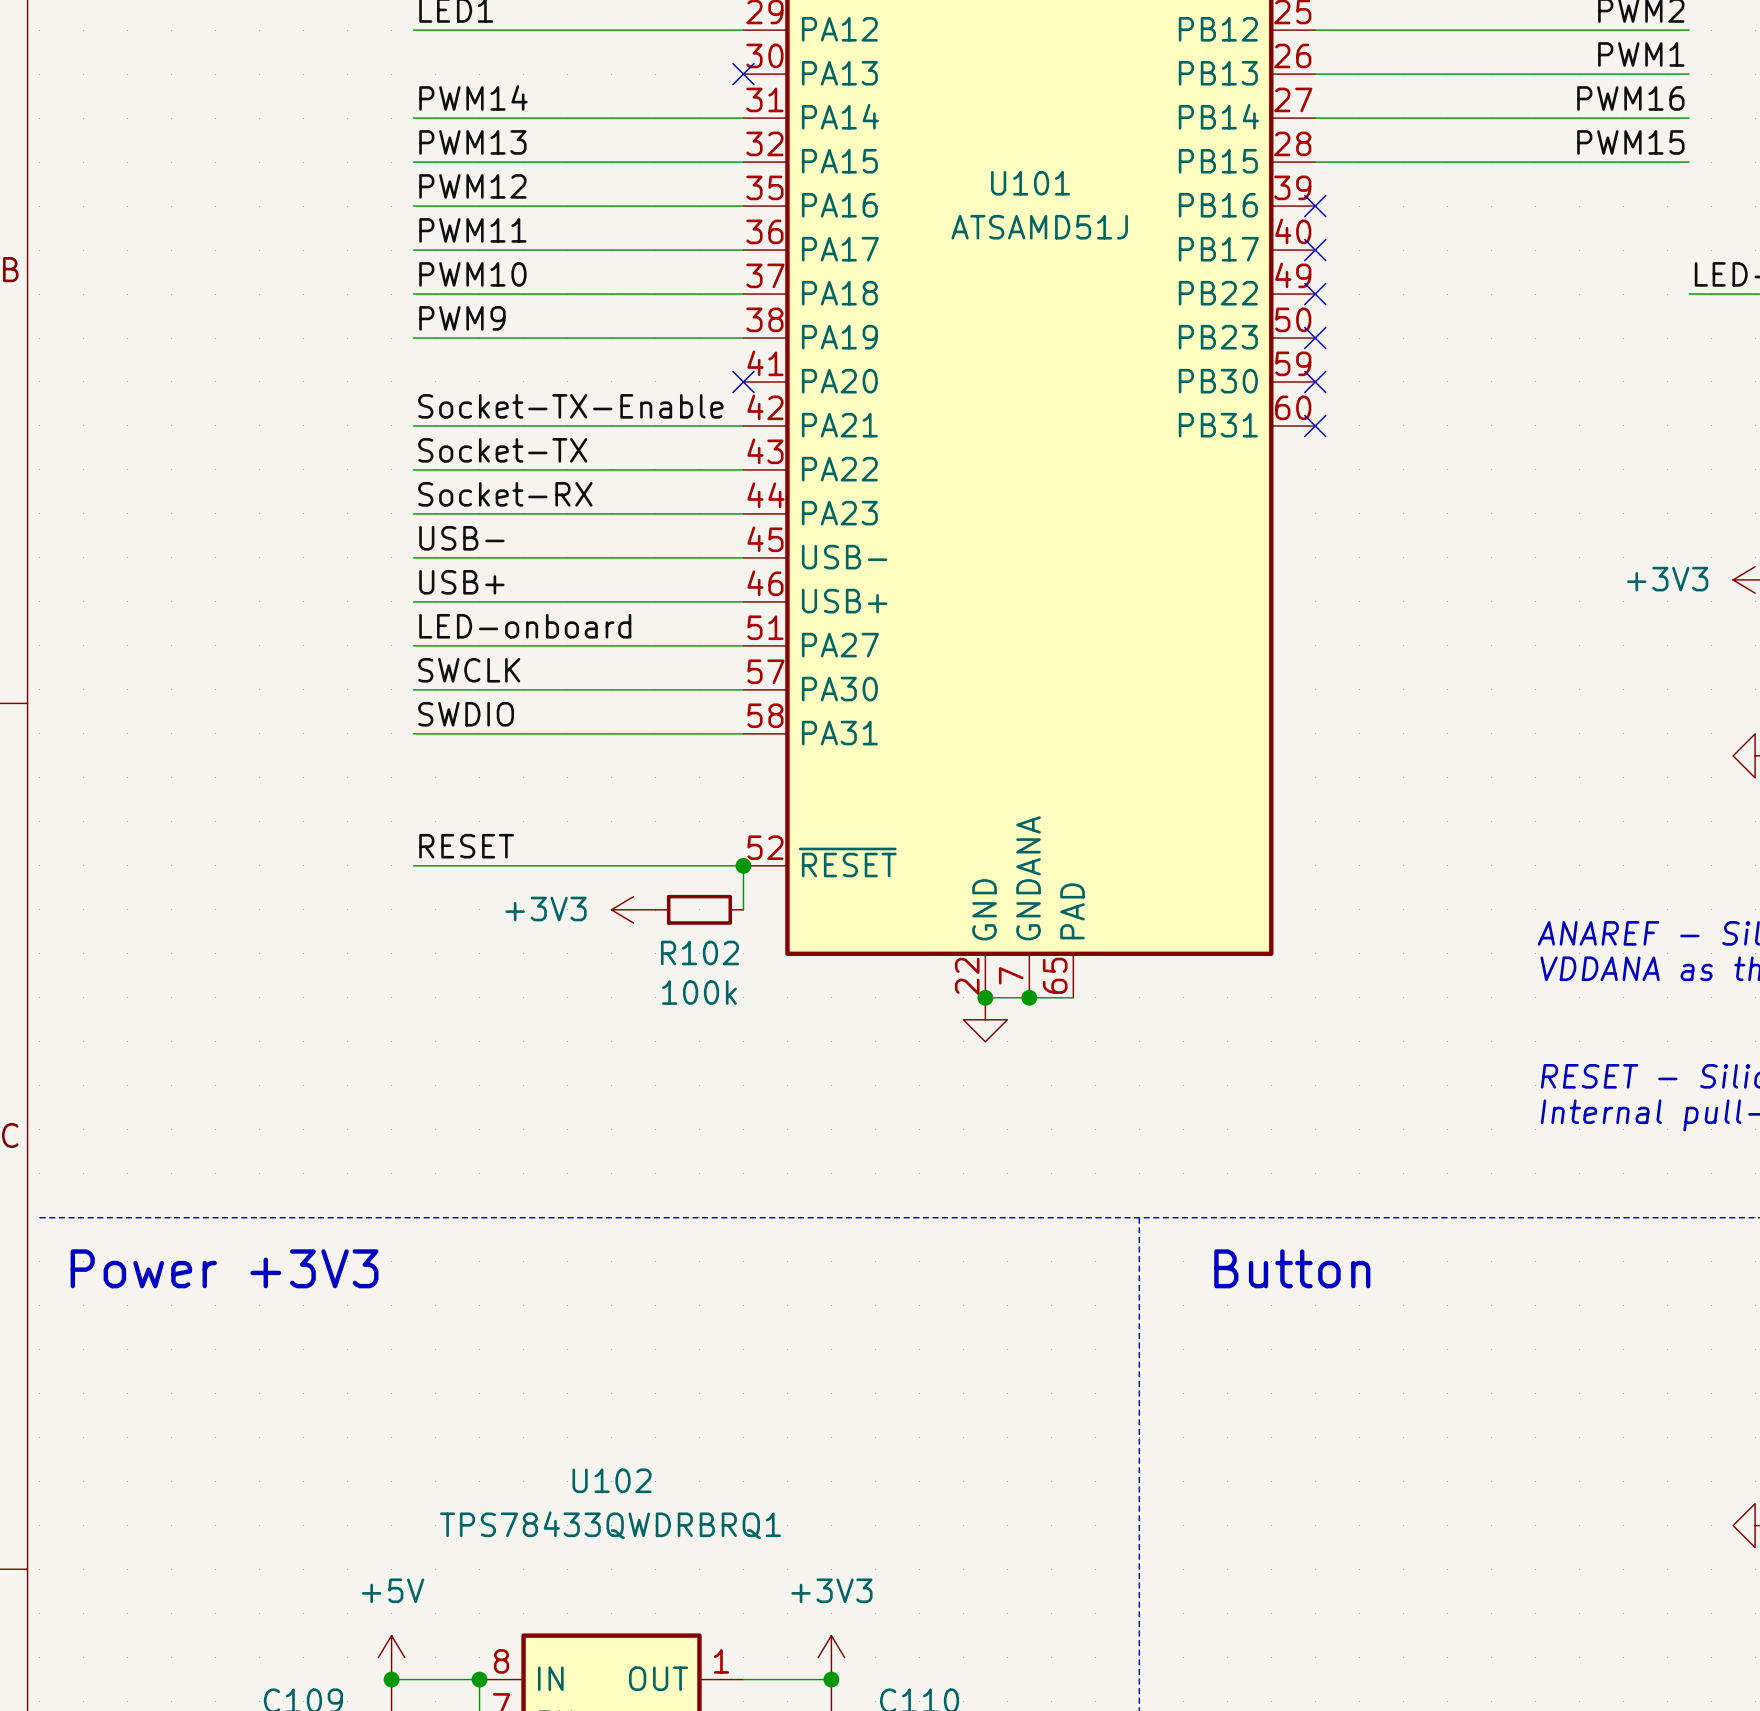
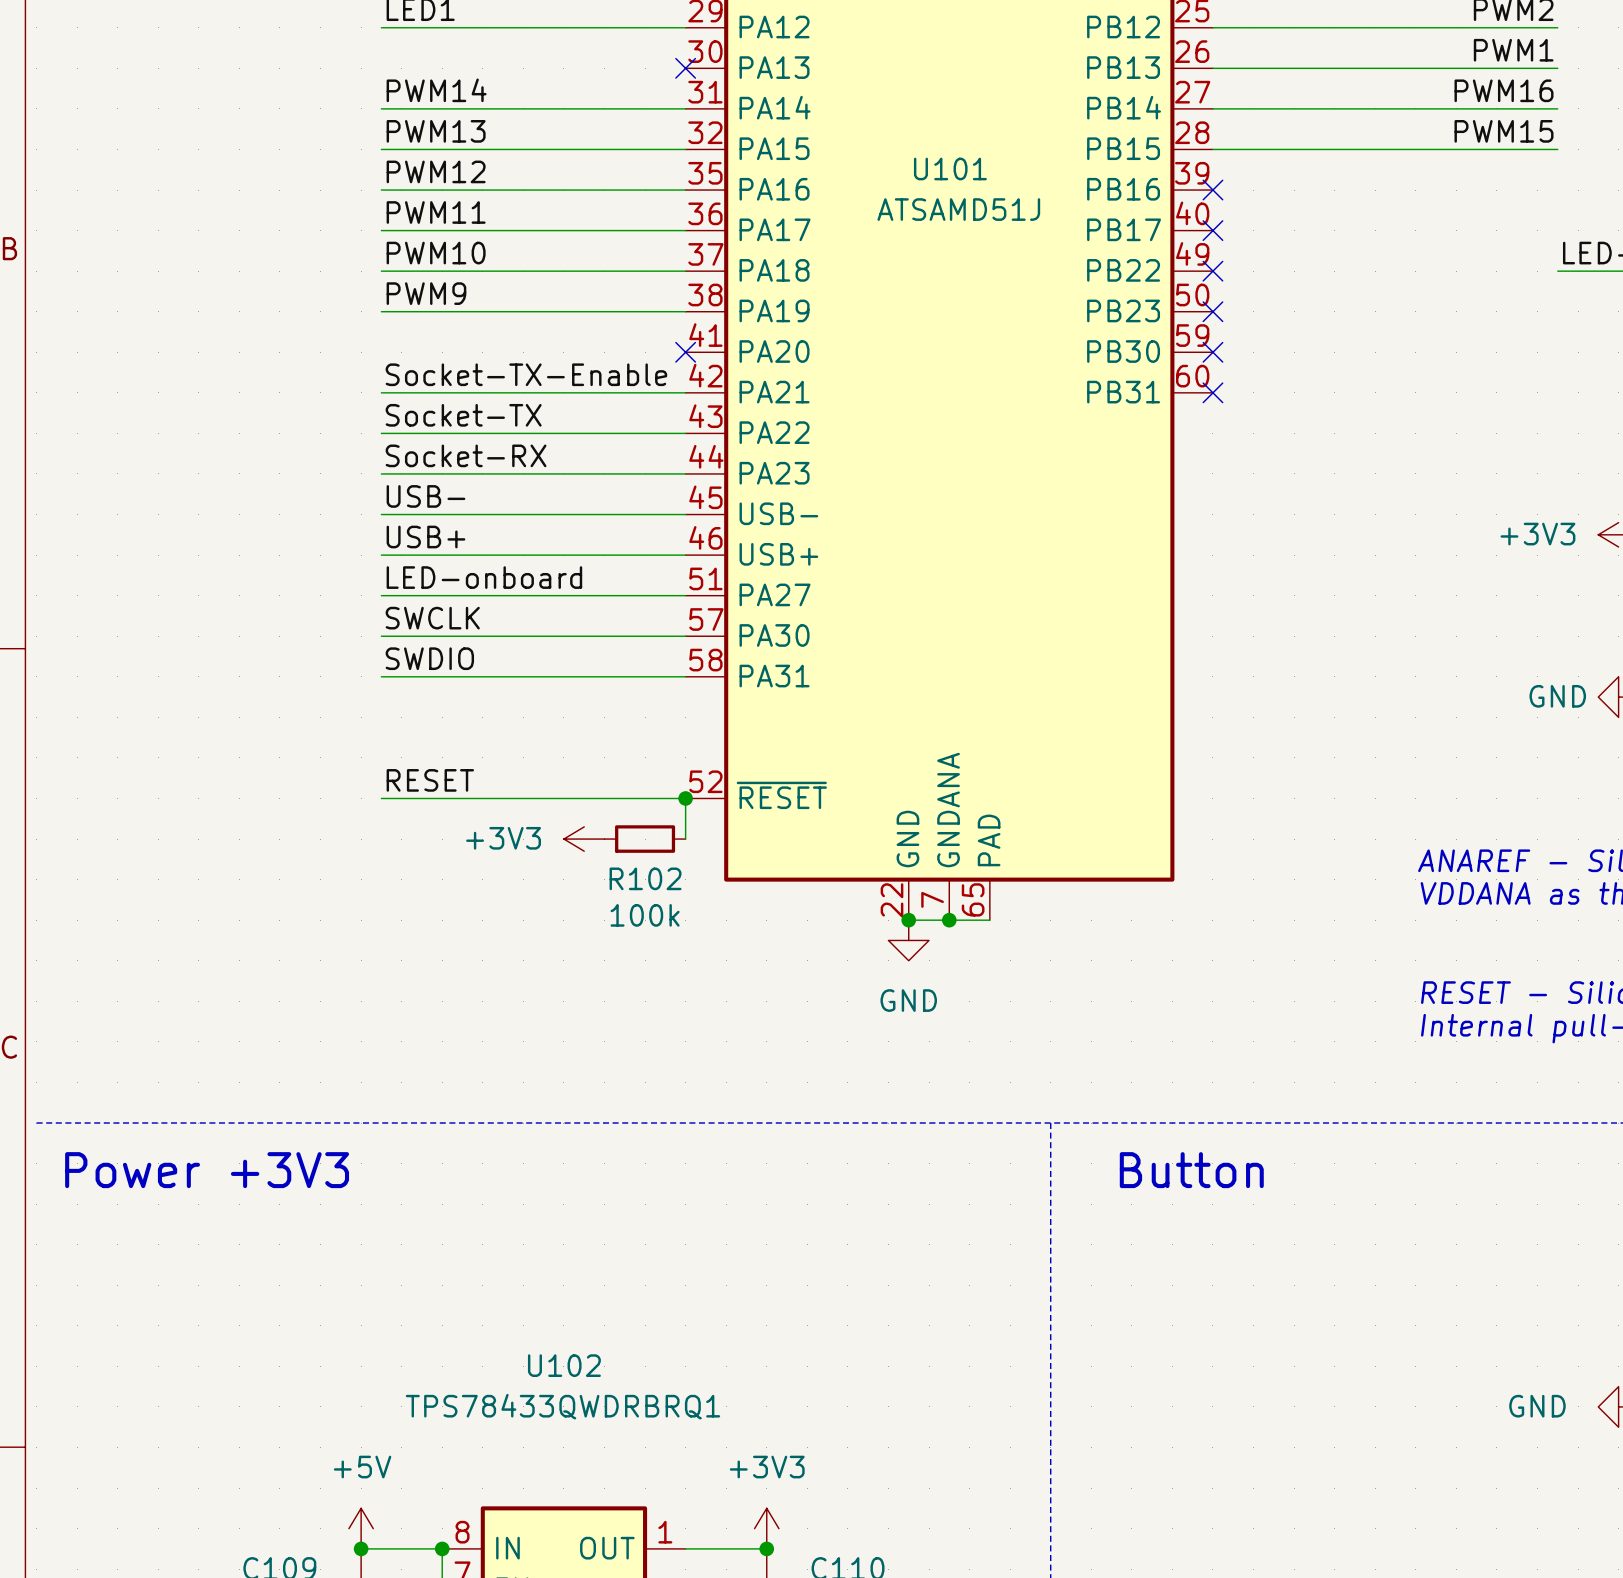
power symbol text: none -> GND (1557, 696)
power symbol text: none -> GND (908, 1000)
power symbol text: none -> GND (1537, 1406)

